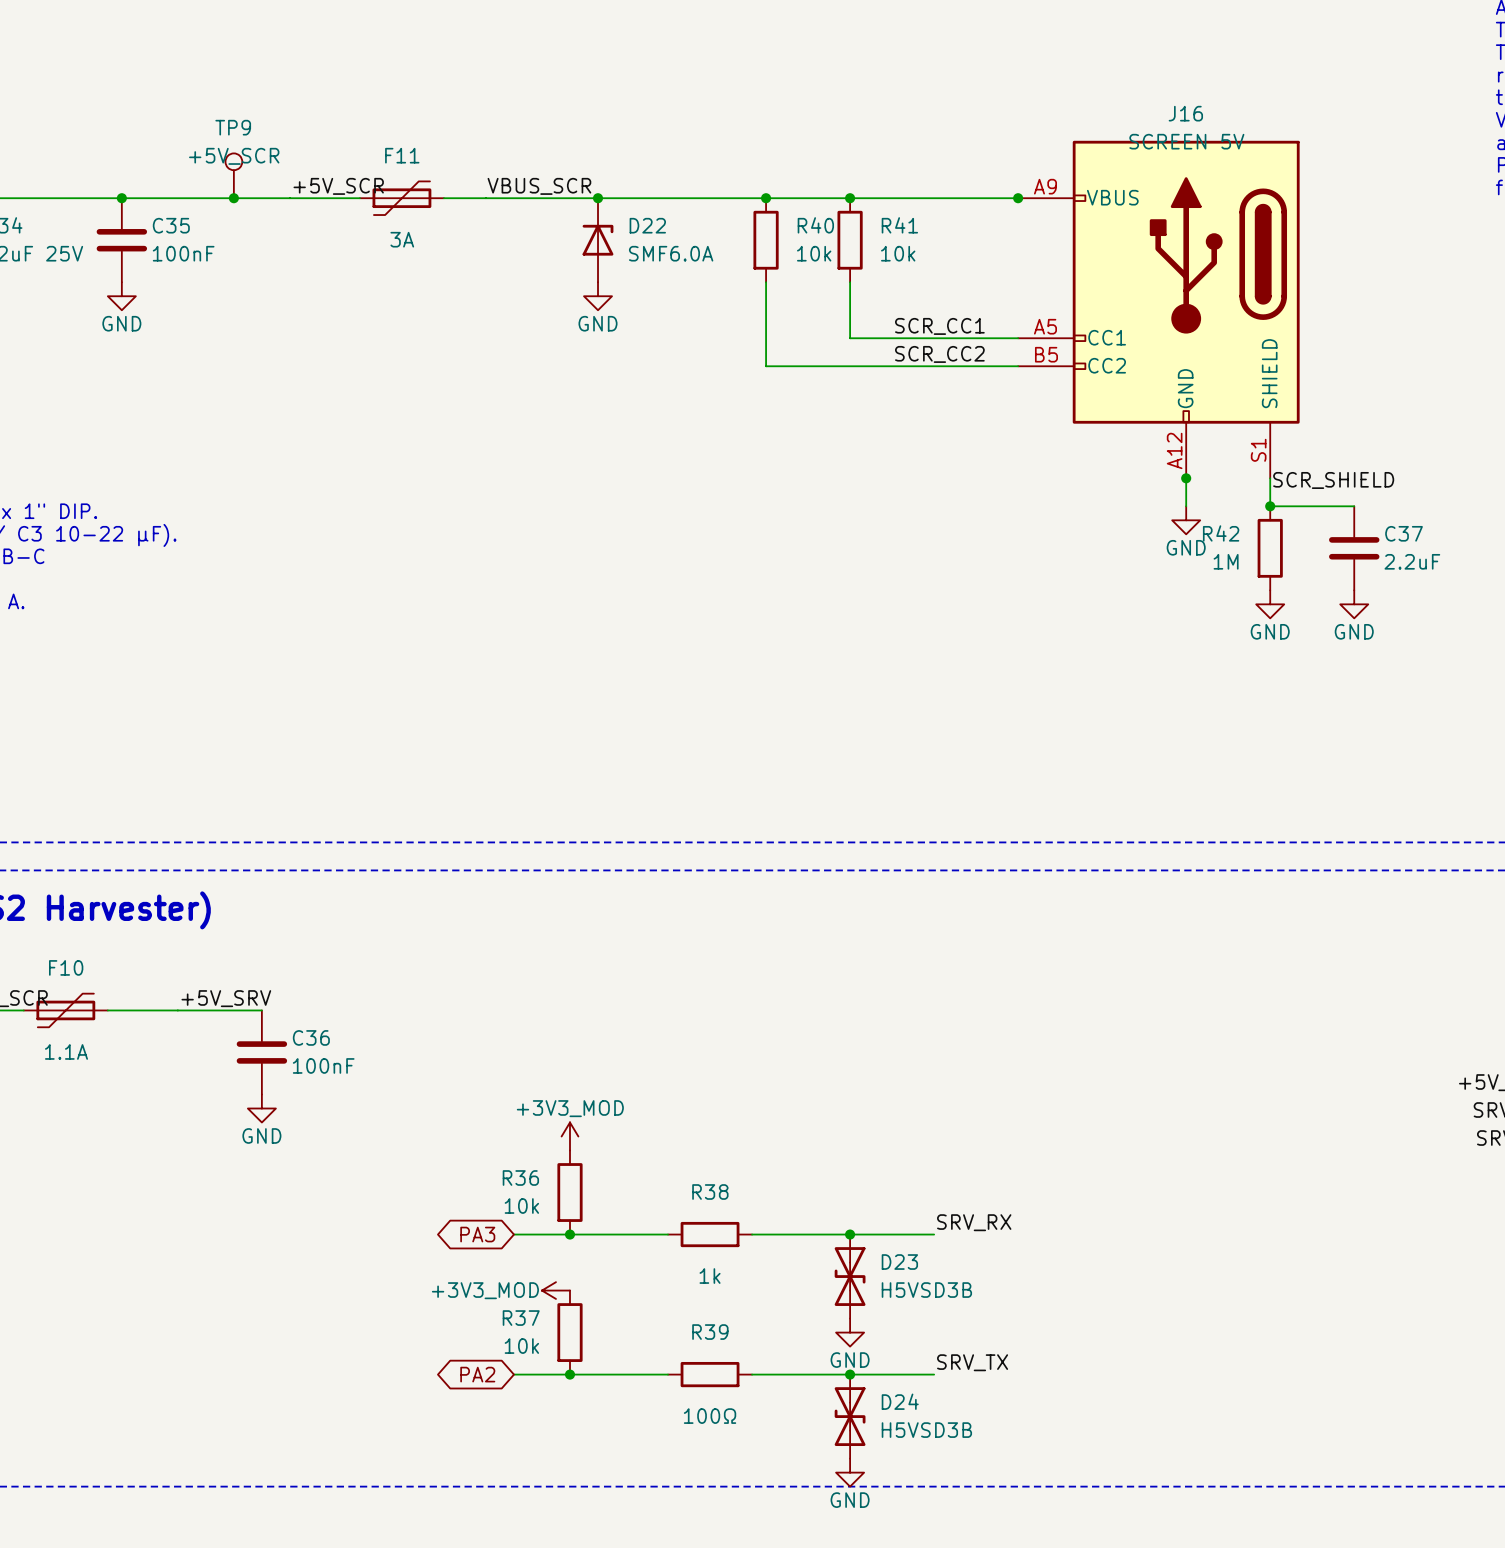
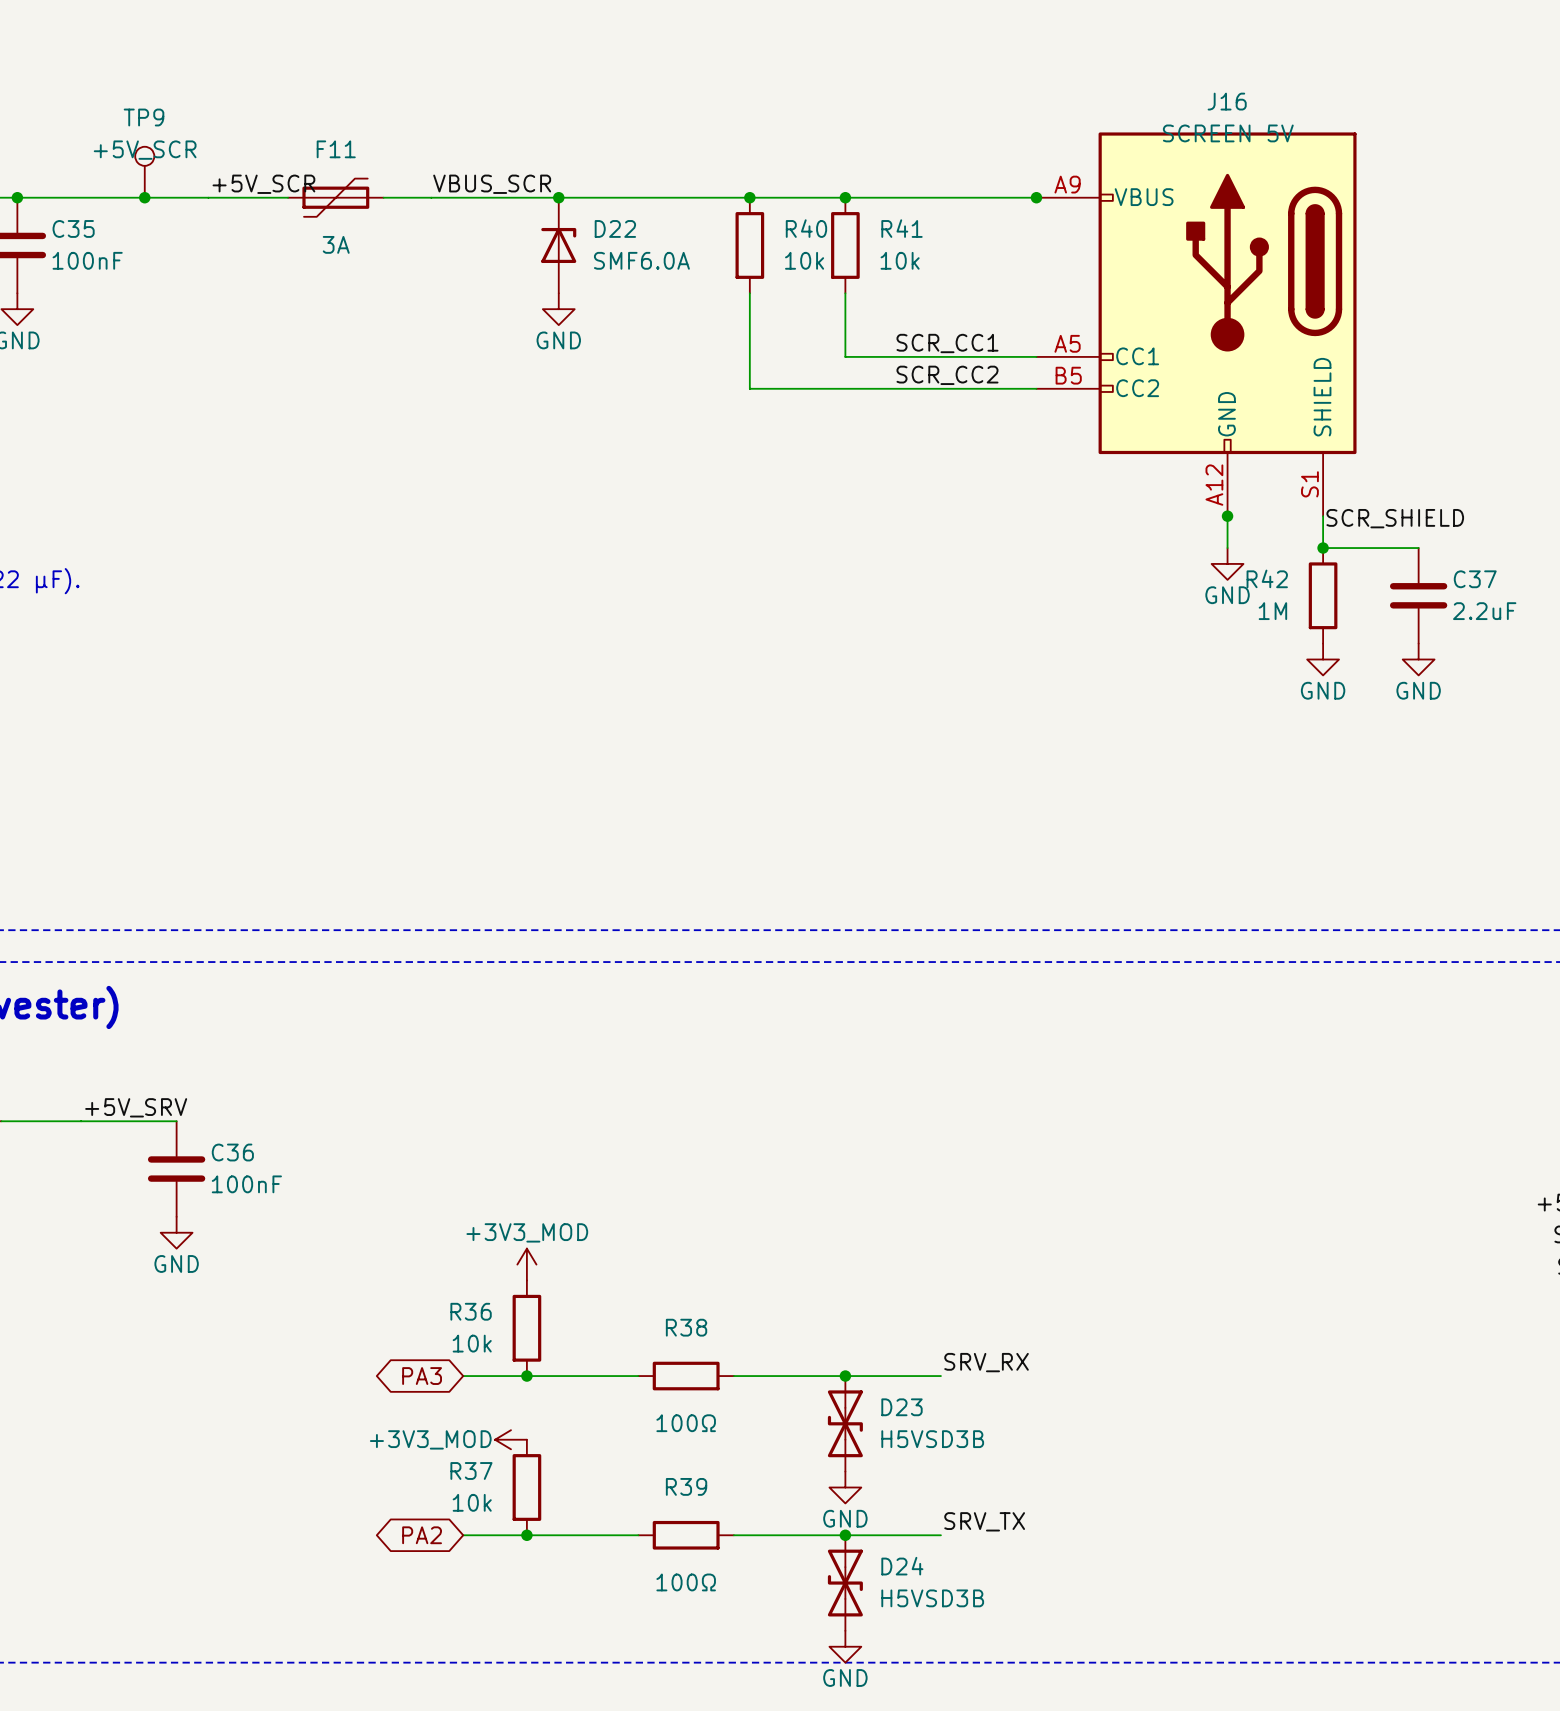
R38 value: 1k (710, 1276) -> 100Ω (686, 1423)

